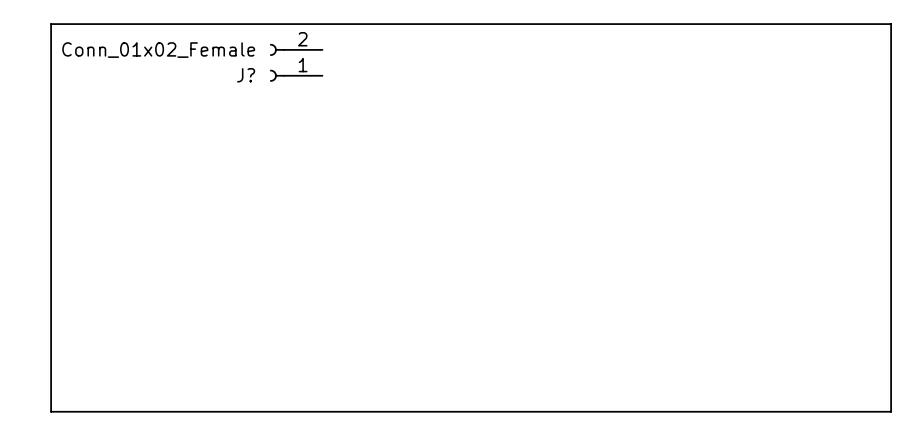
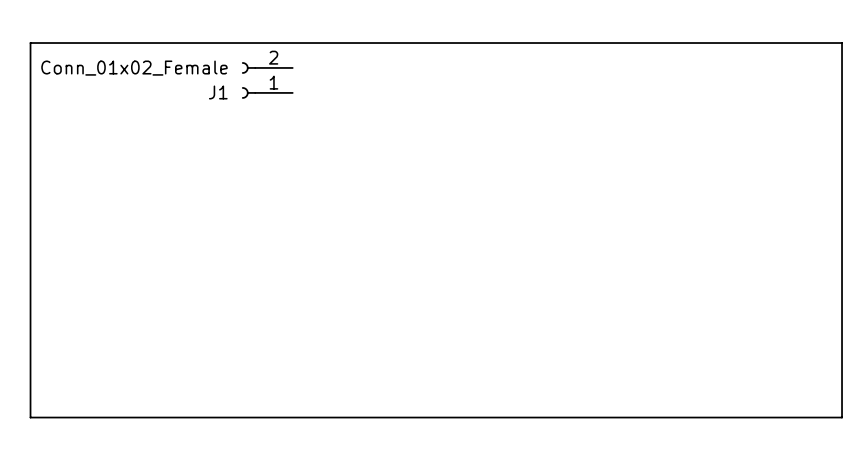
J? name: J? (246, 75) -> J1 (218, 92)

